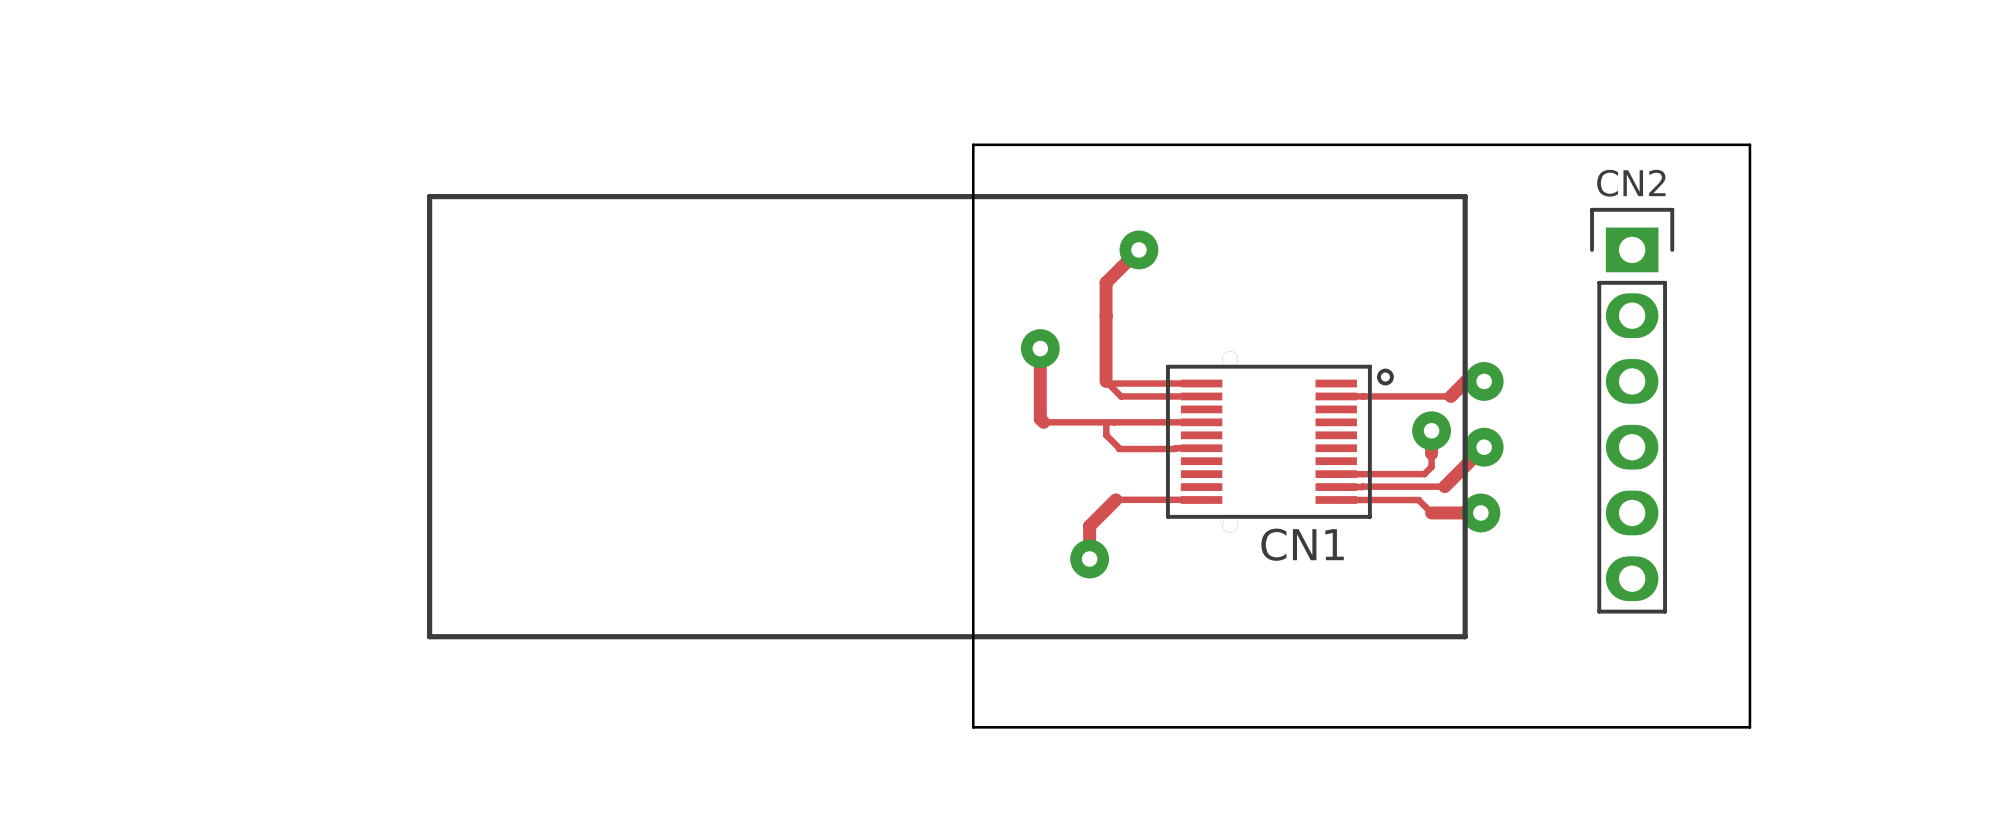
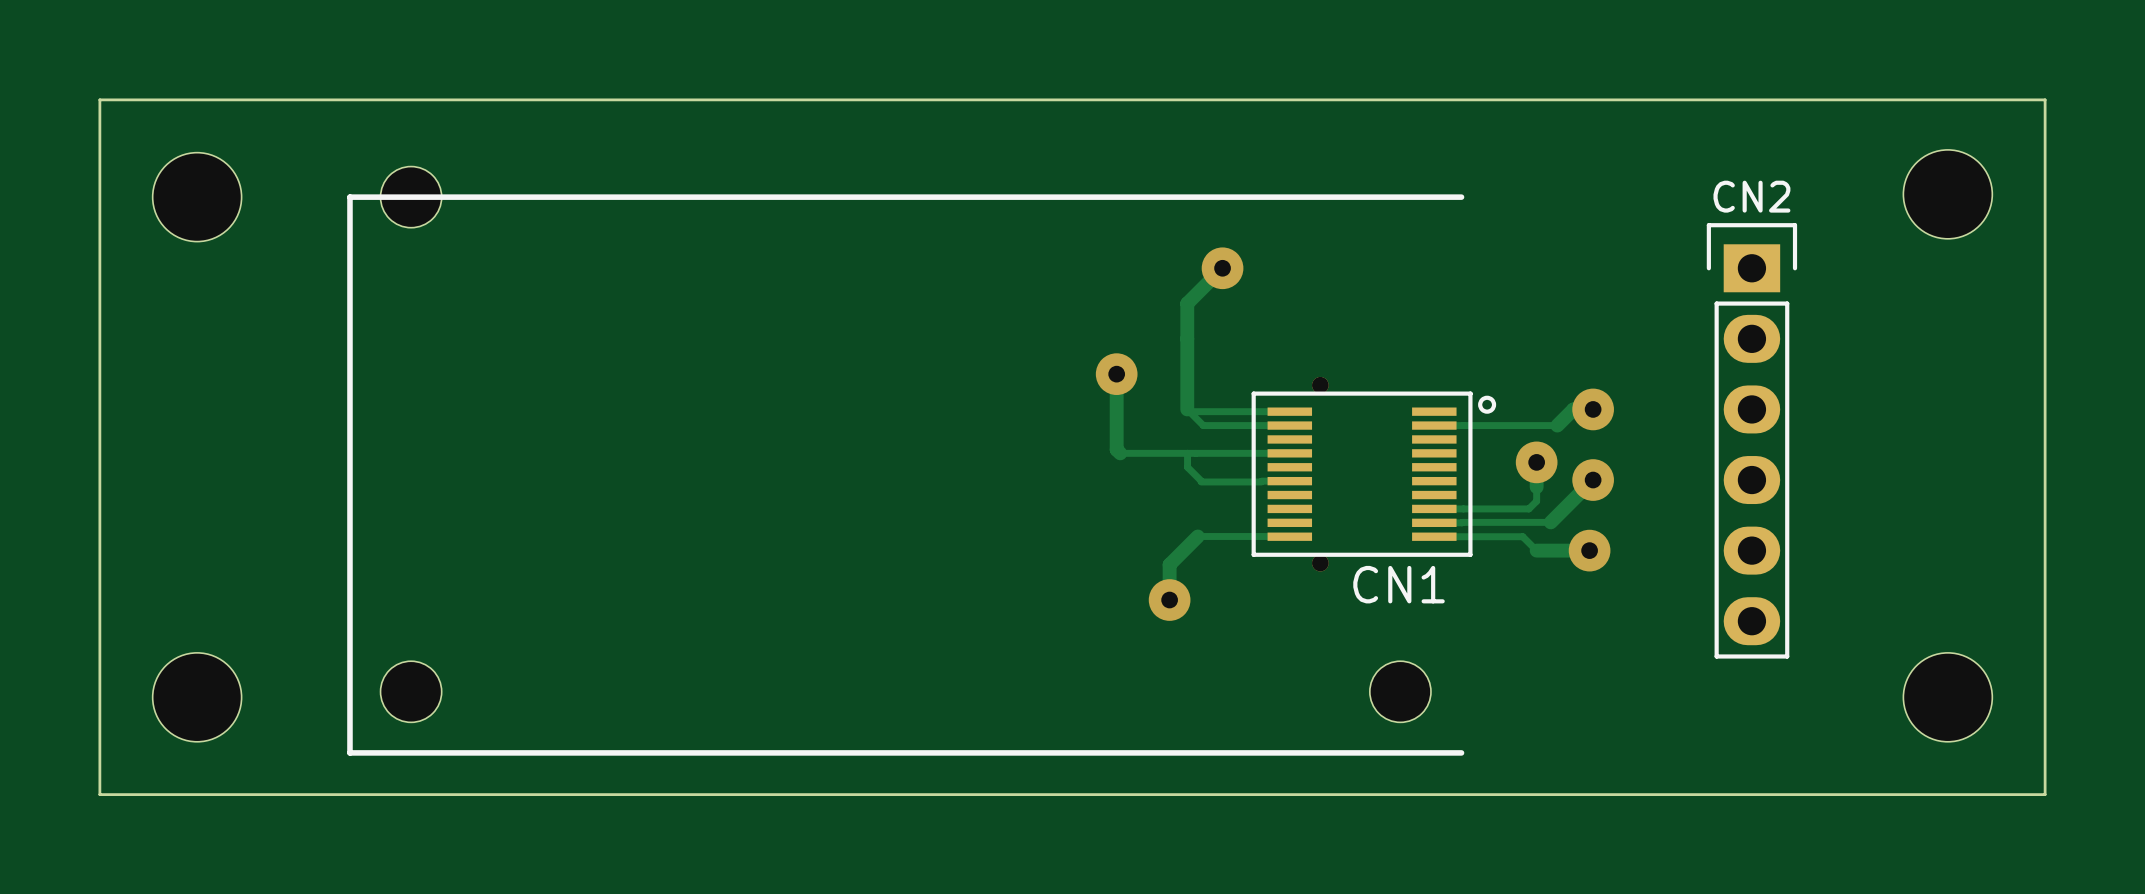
board edge: none -> (99, 99) (2045, 99) (2045, 794) (99, 794) (99, 99)
board edge: (973, 144) (1749, 144) (1749, 727) (973, 727) (973, 144) -> none
part: none -> (1947, 194)
part: none -> (197, 197)
part: none -> (411, 197)
line: none -> (1461, 197) (349, 197) (349, 752) (1461, 752)
line: (429, 196) (429, 636) (1465, 636) (1465, 196) (429, 196) -> none
part: none -> (411, 691)
part: none -> (1400, 691)
part: none -> (197, 697)
part: none -> (1947, 697)

